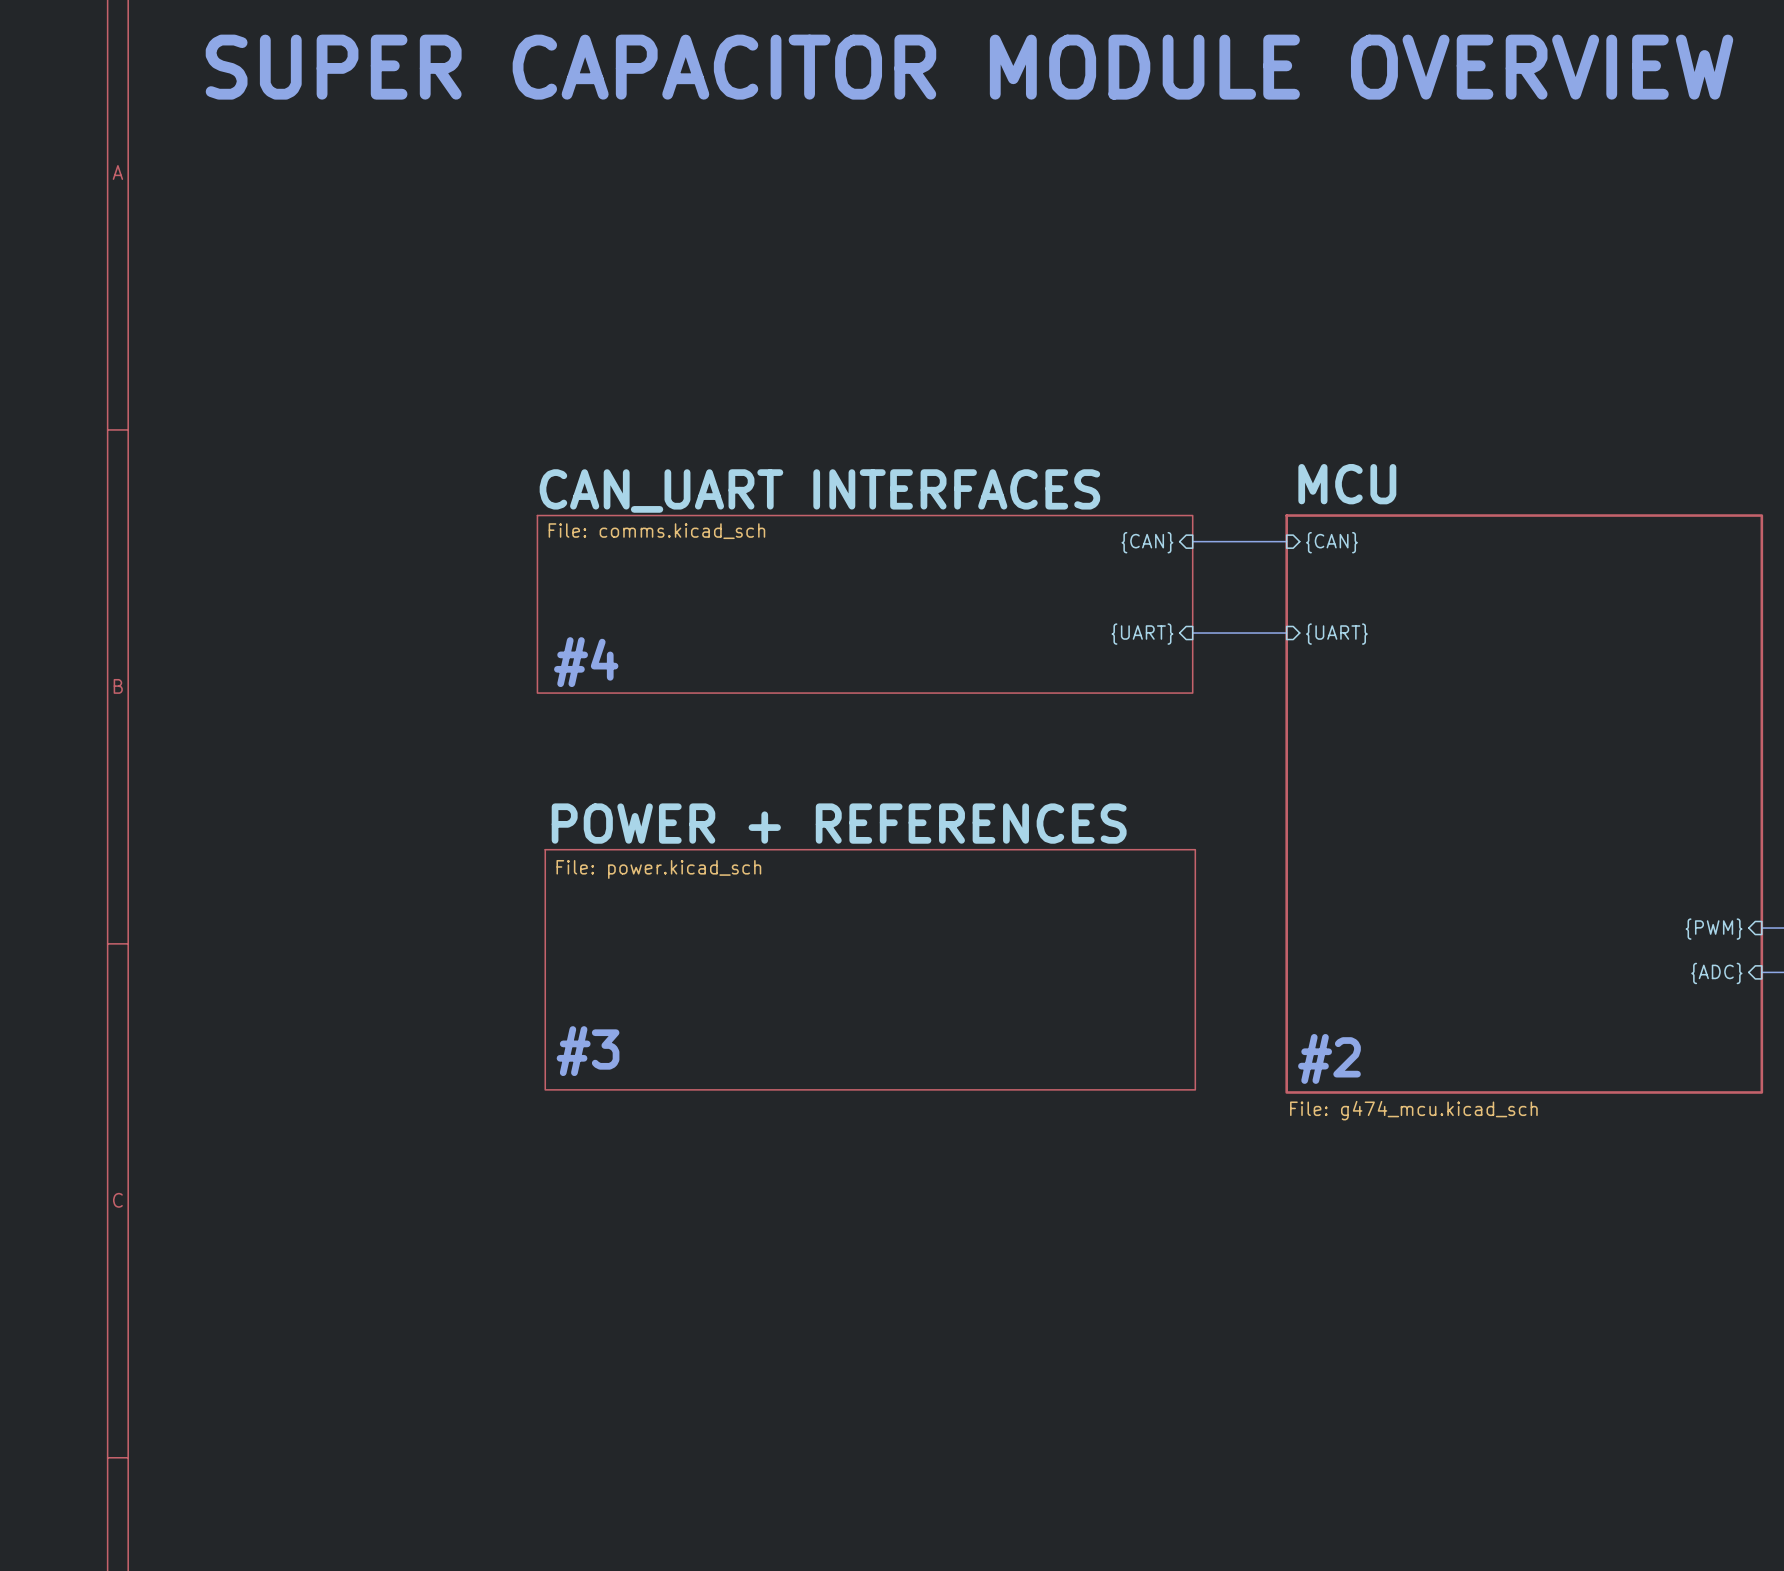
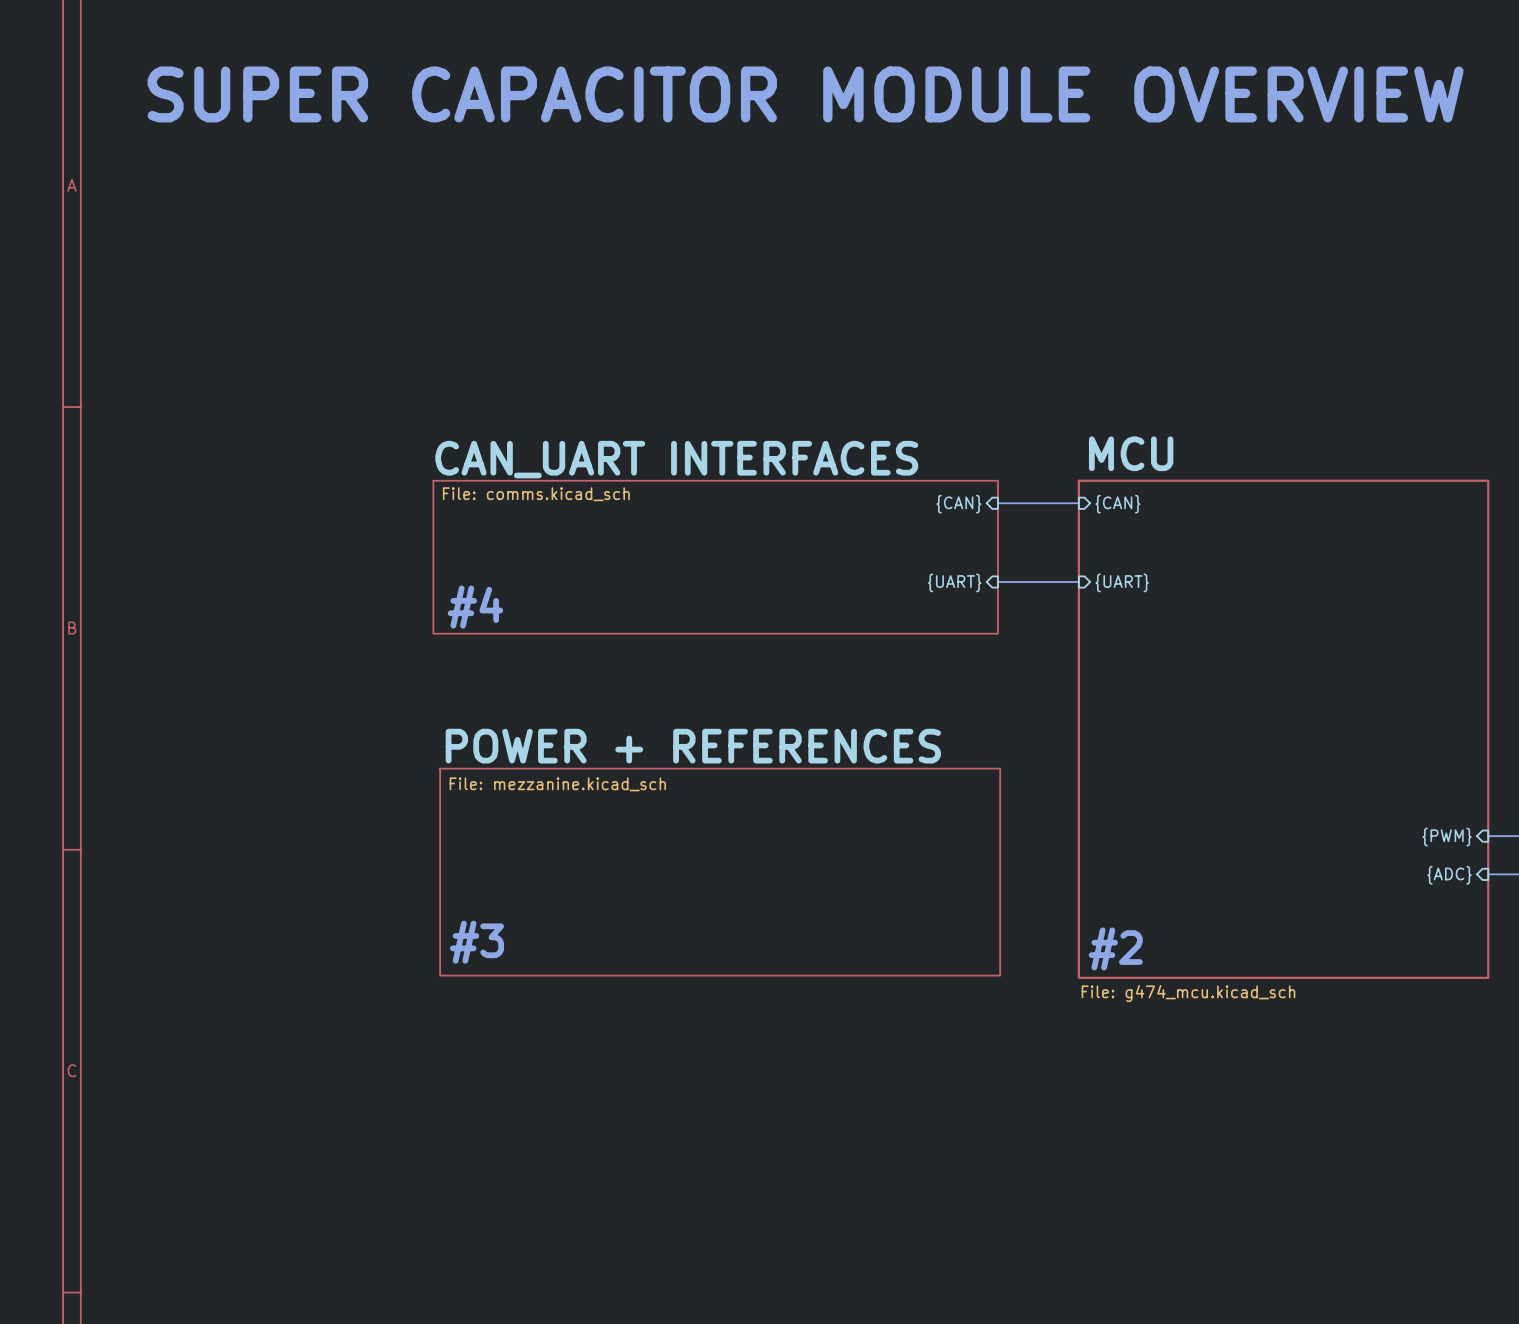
sheet POWER + REFERENCES value: File: power.kicad_sch (658, 869) -> File: mezzanine.kicad_sch (557, 784)

